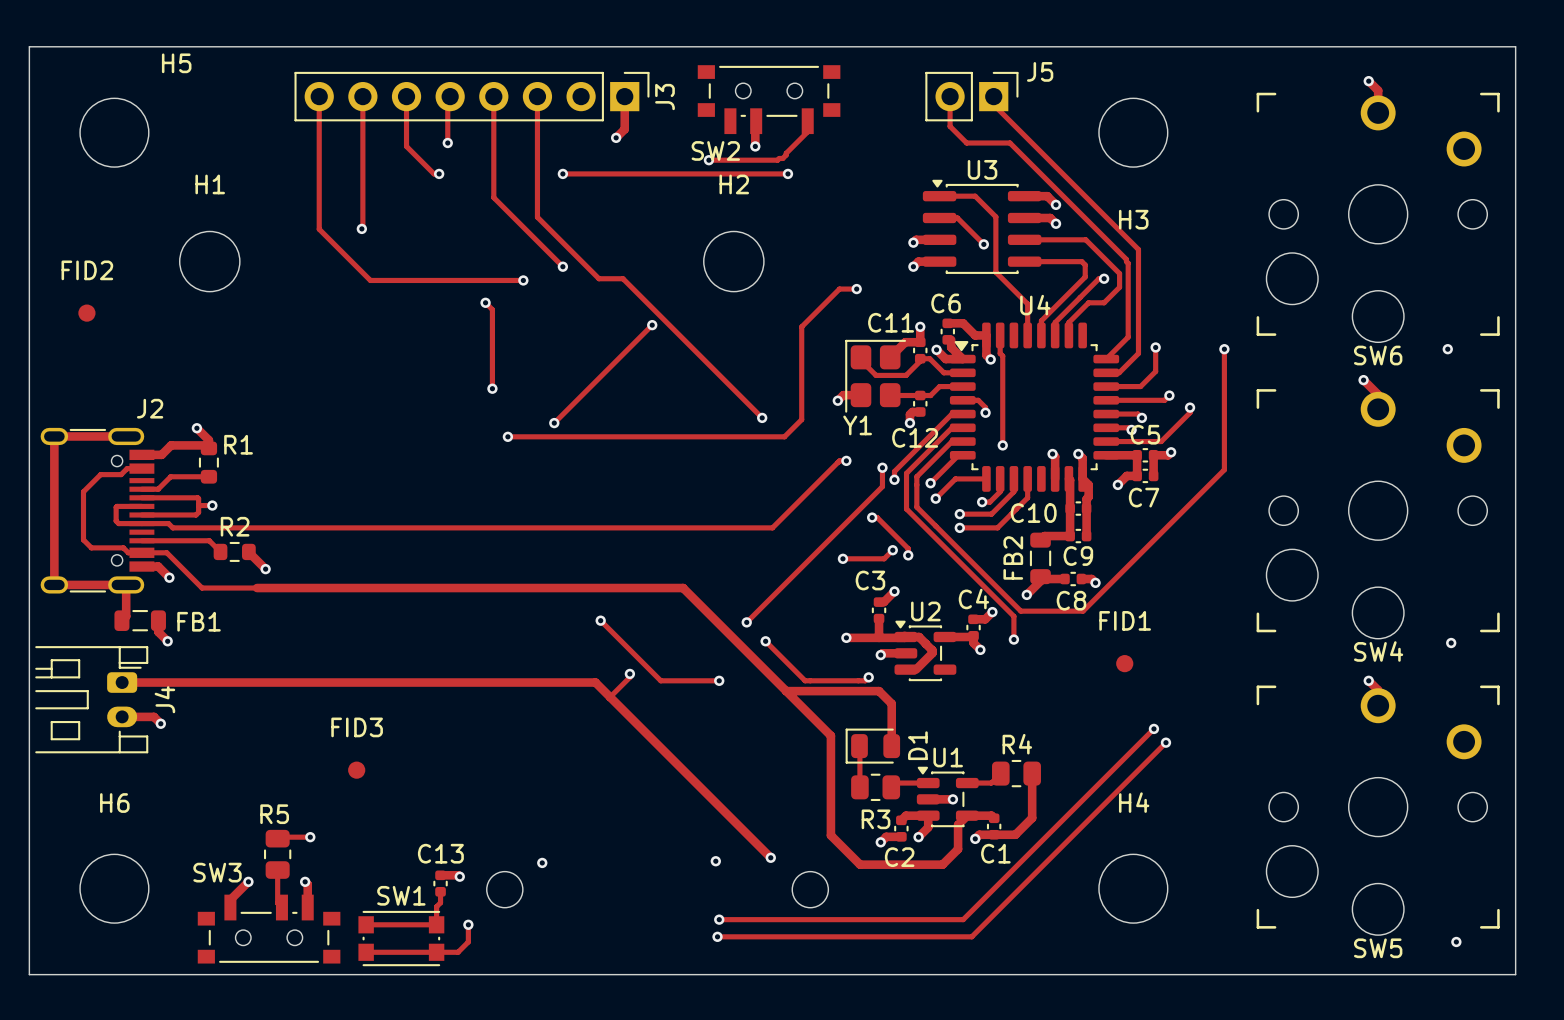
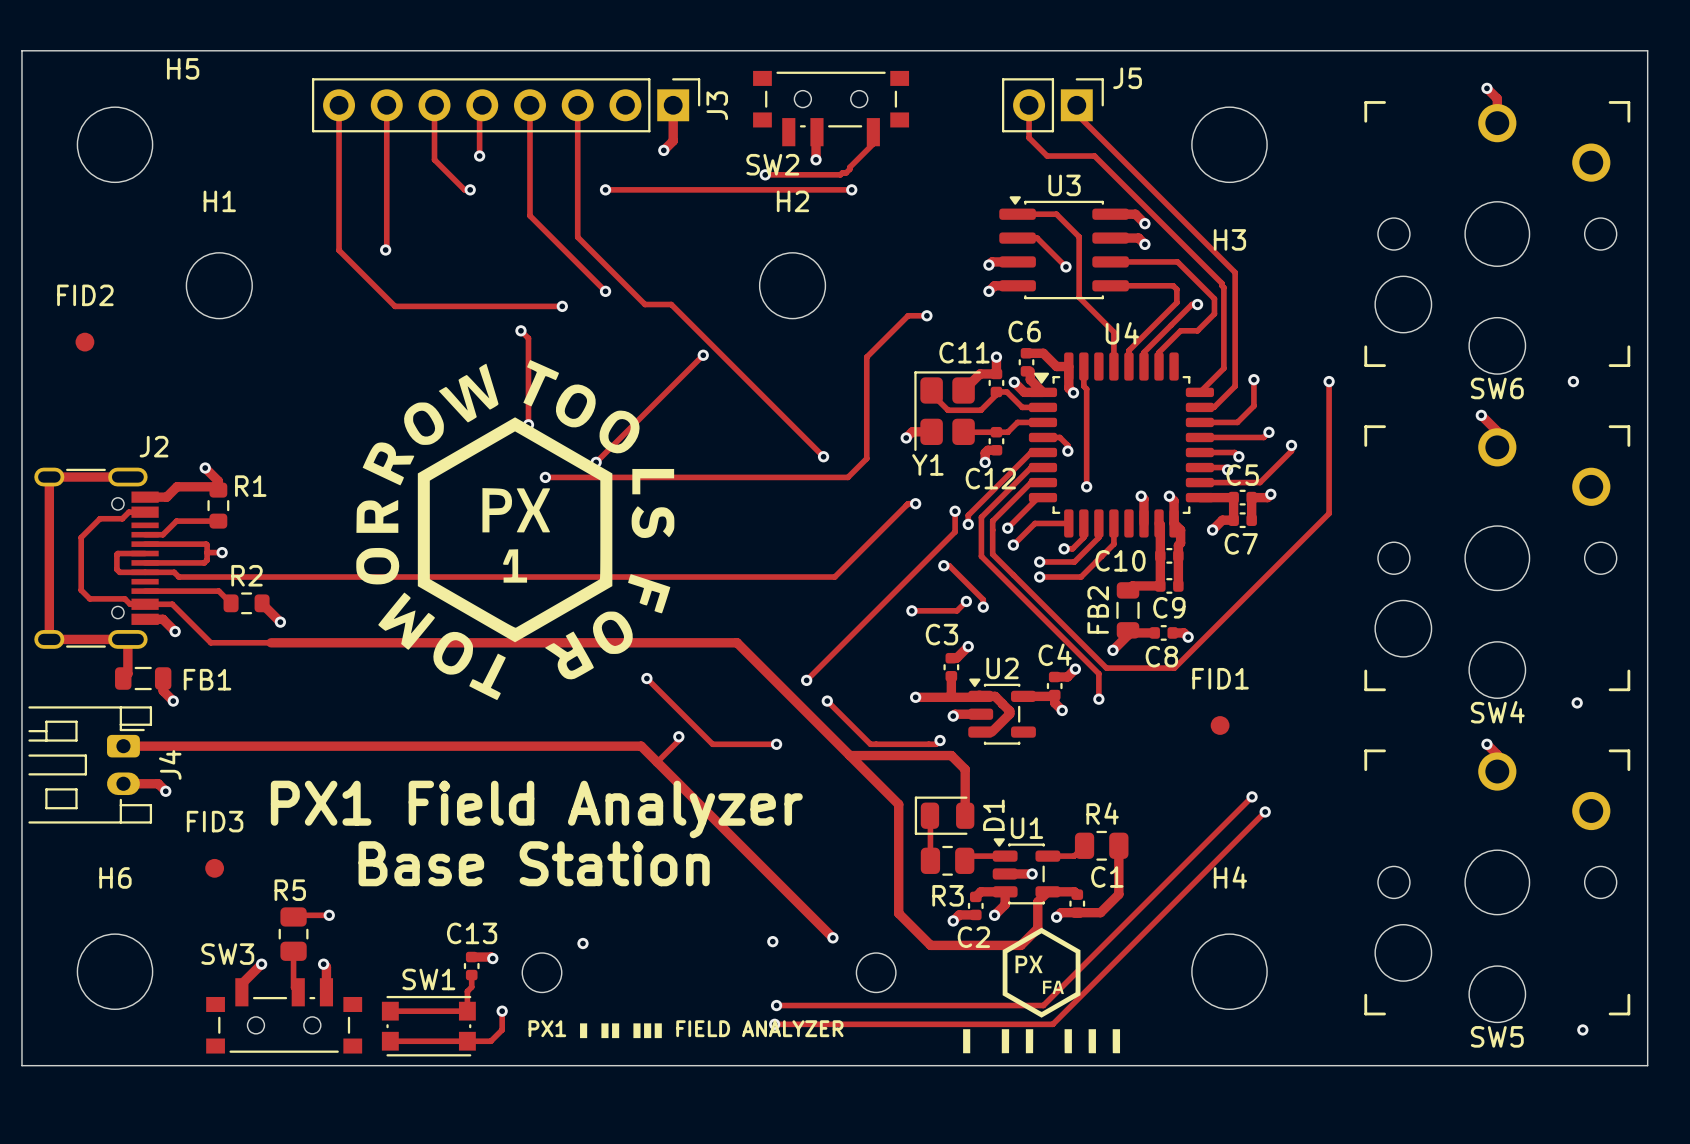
drawing: none -> [356, 360, 675, 701]
text: none -> PX1 Field Analyzer (536, 809)
FID3 position: (356, 770) -> (214, 868)
text: none -> Base Station (534, 863)
drawing: none -> [963, 927, 1121, 1054]
C1 name position: C1 (995, 853) -> C1 (1107, 877)
text: none -> PX1 ▮ ▮▮ ▮▮▮ FIELD ANALYZER (686, 1029)

